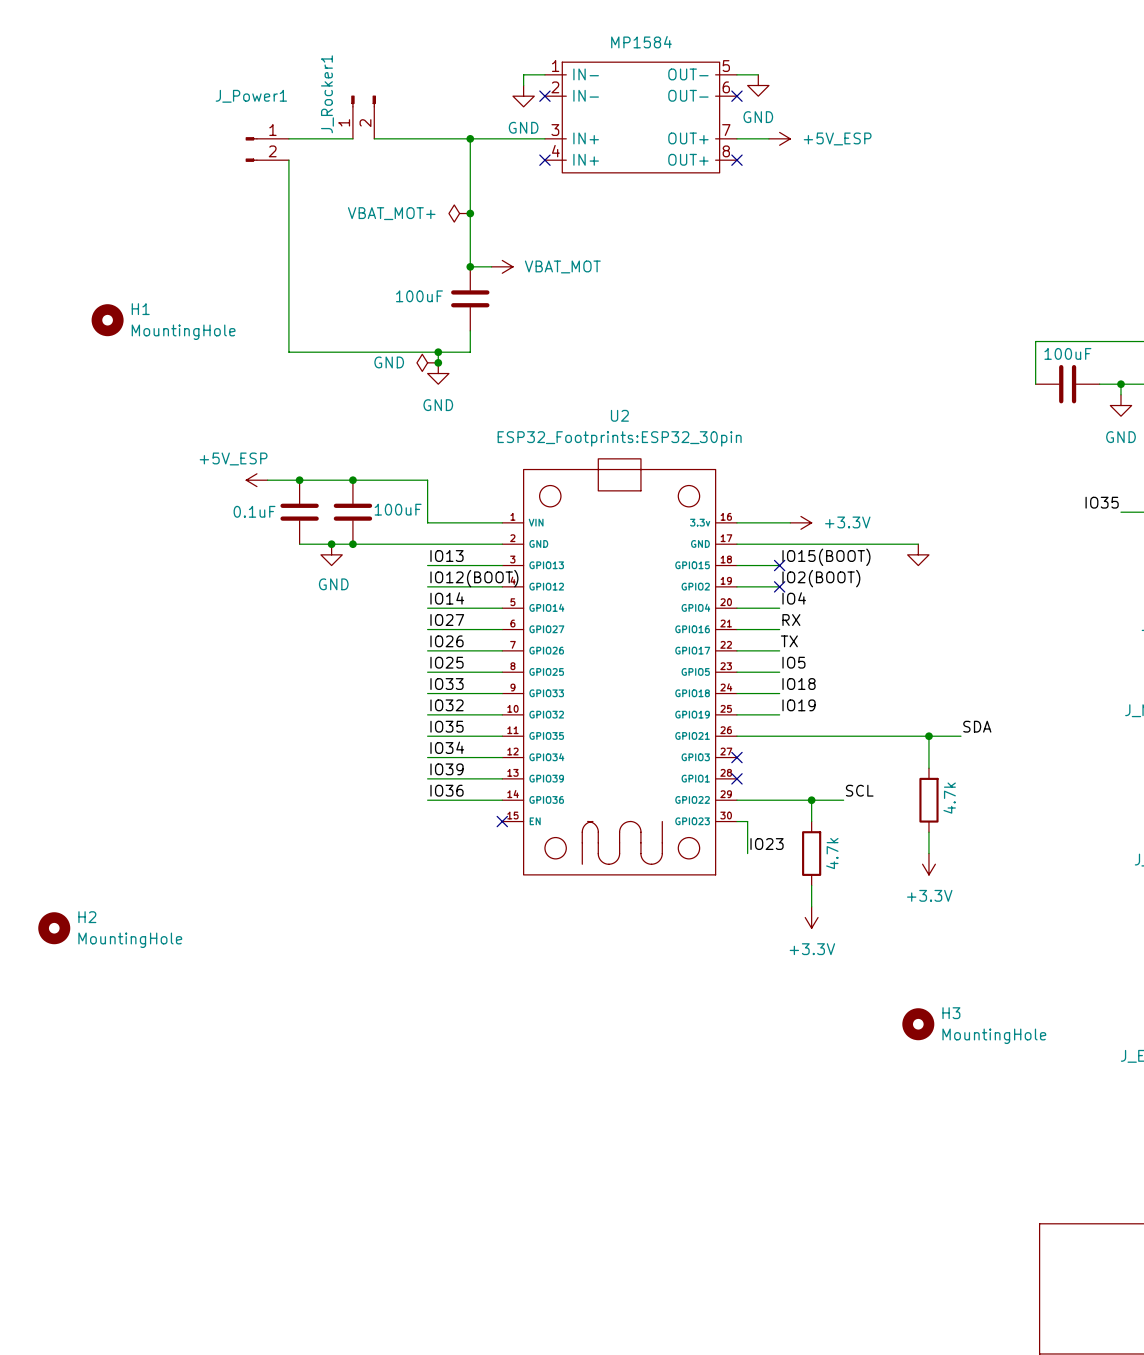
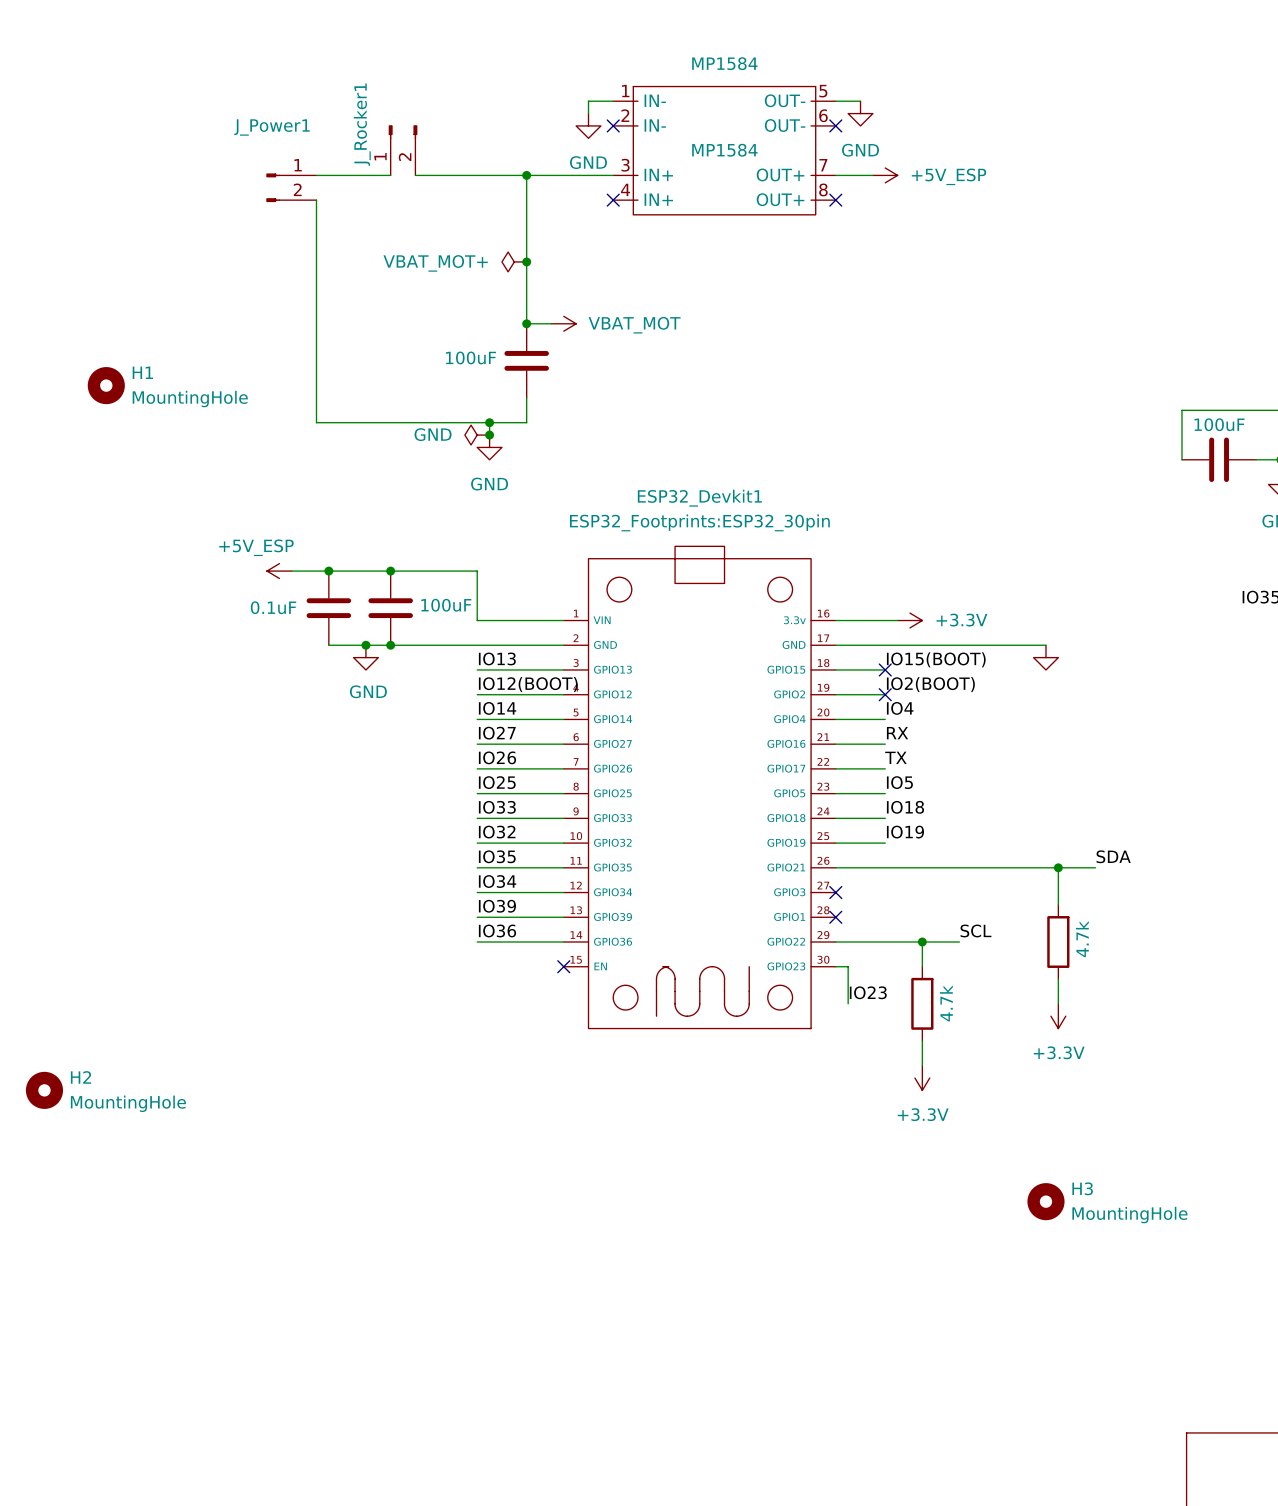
MP1584 value: none -> MP1584 (724, 150)
U2 name: U2 (619, 415) -> ESP32_Devkit1 (699, 498)

